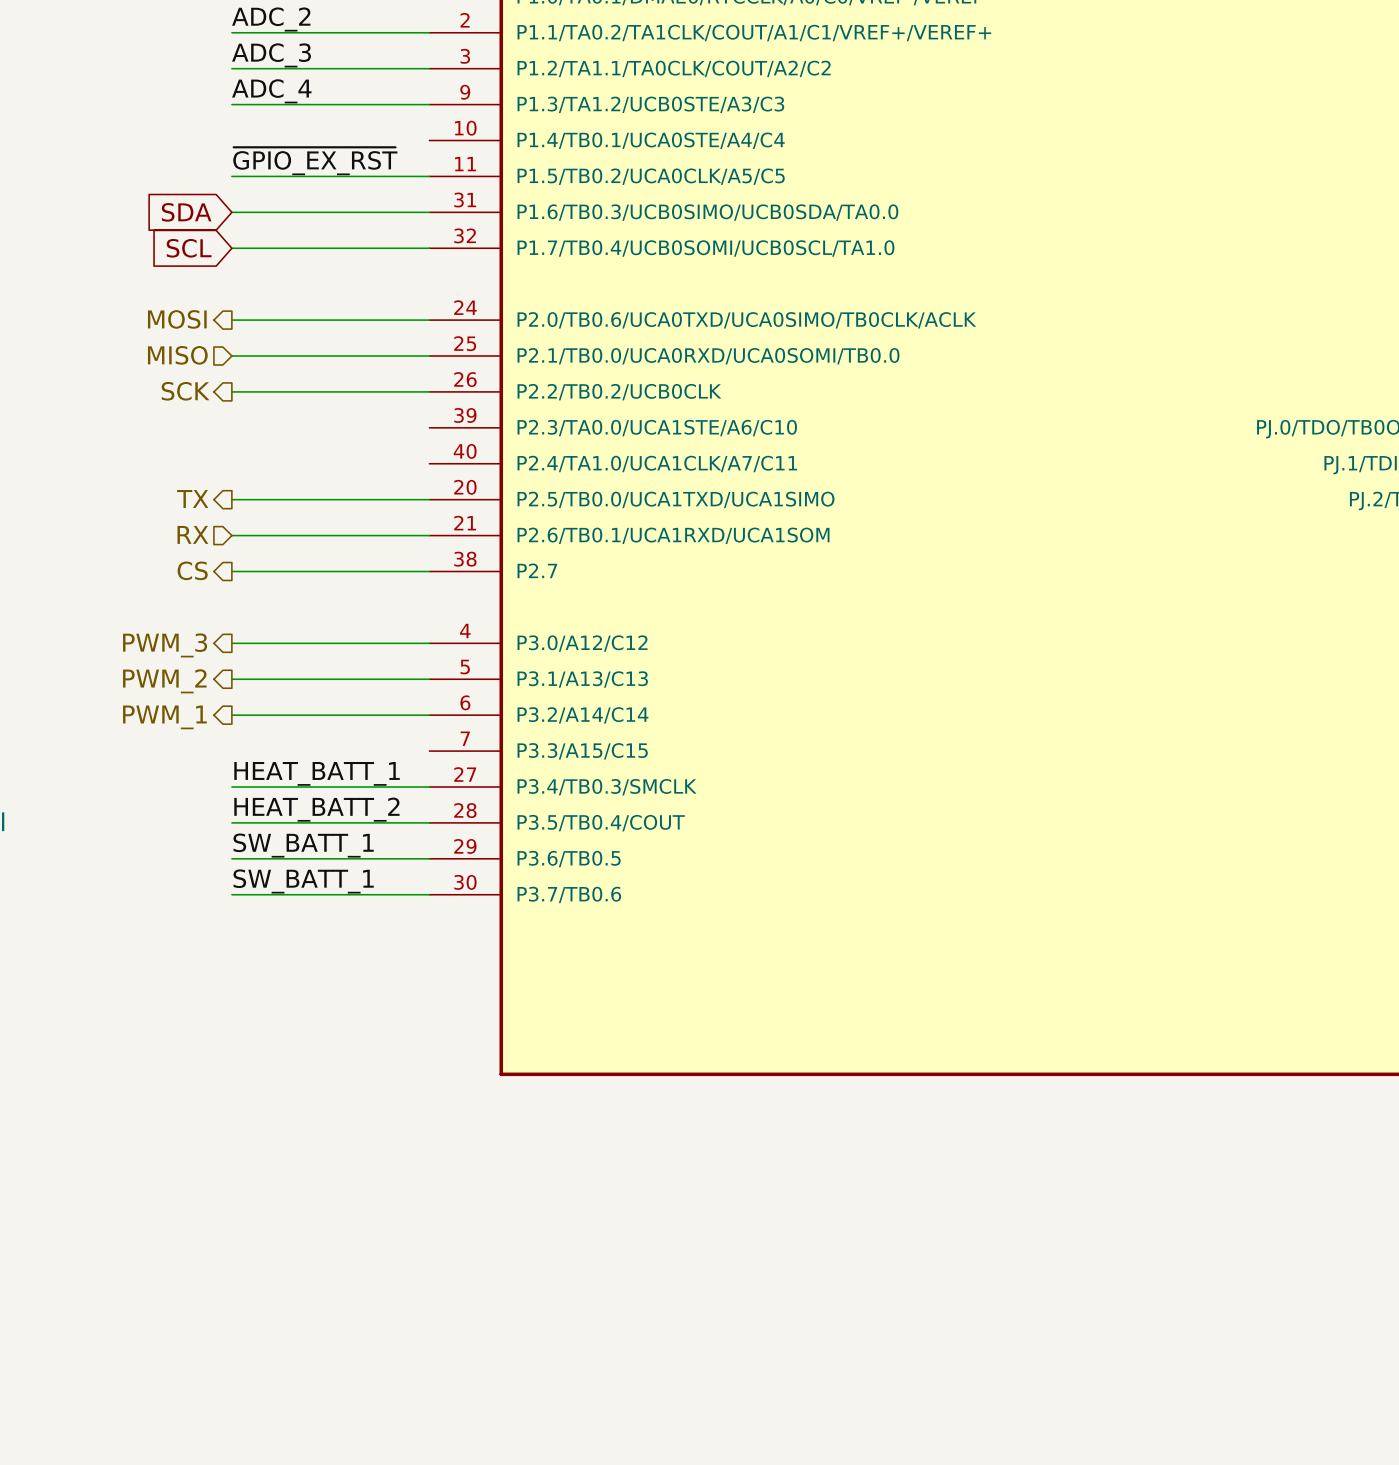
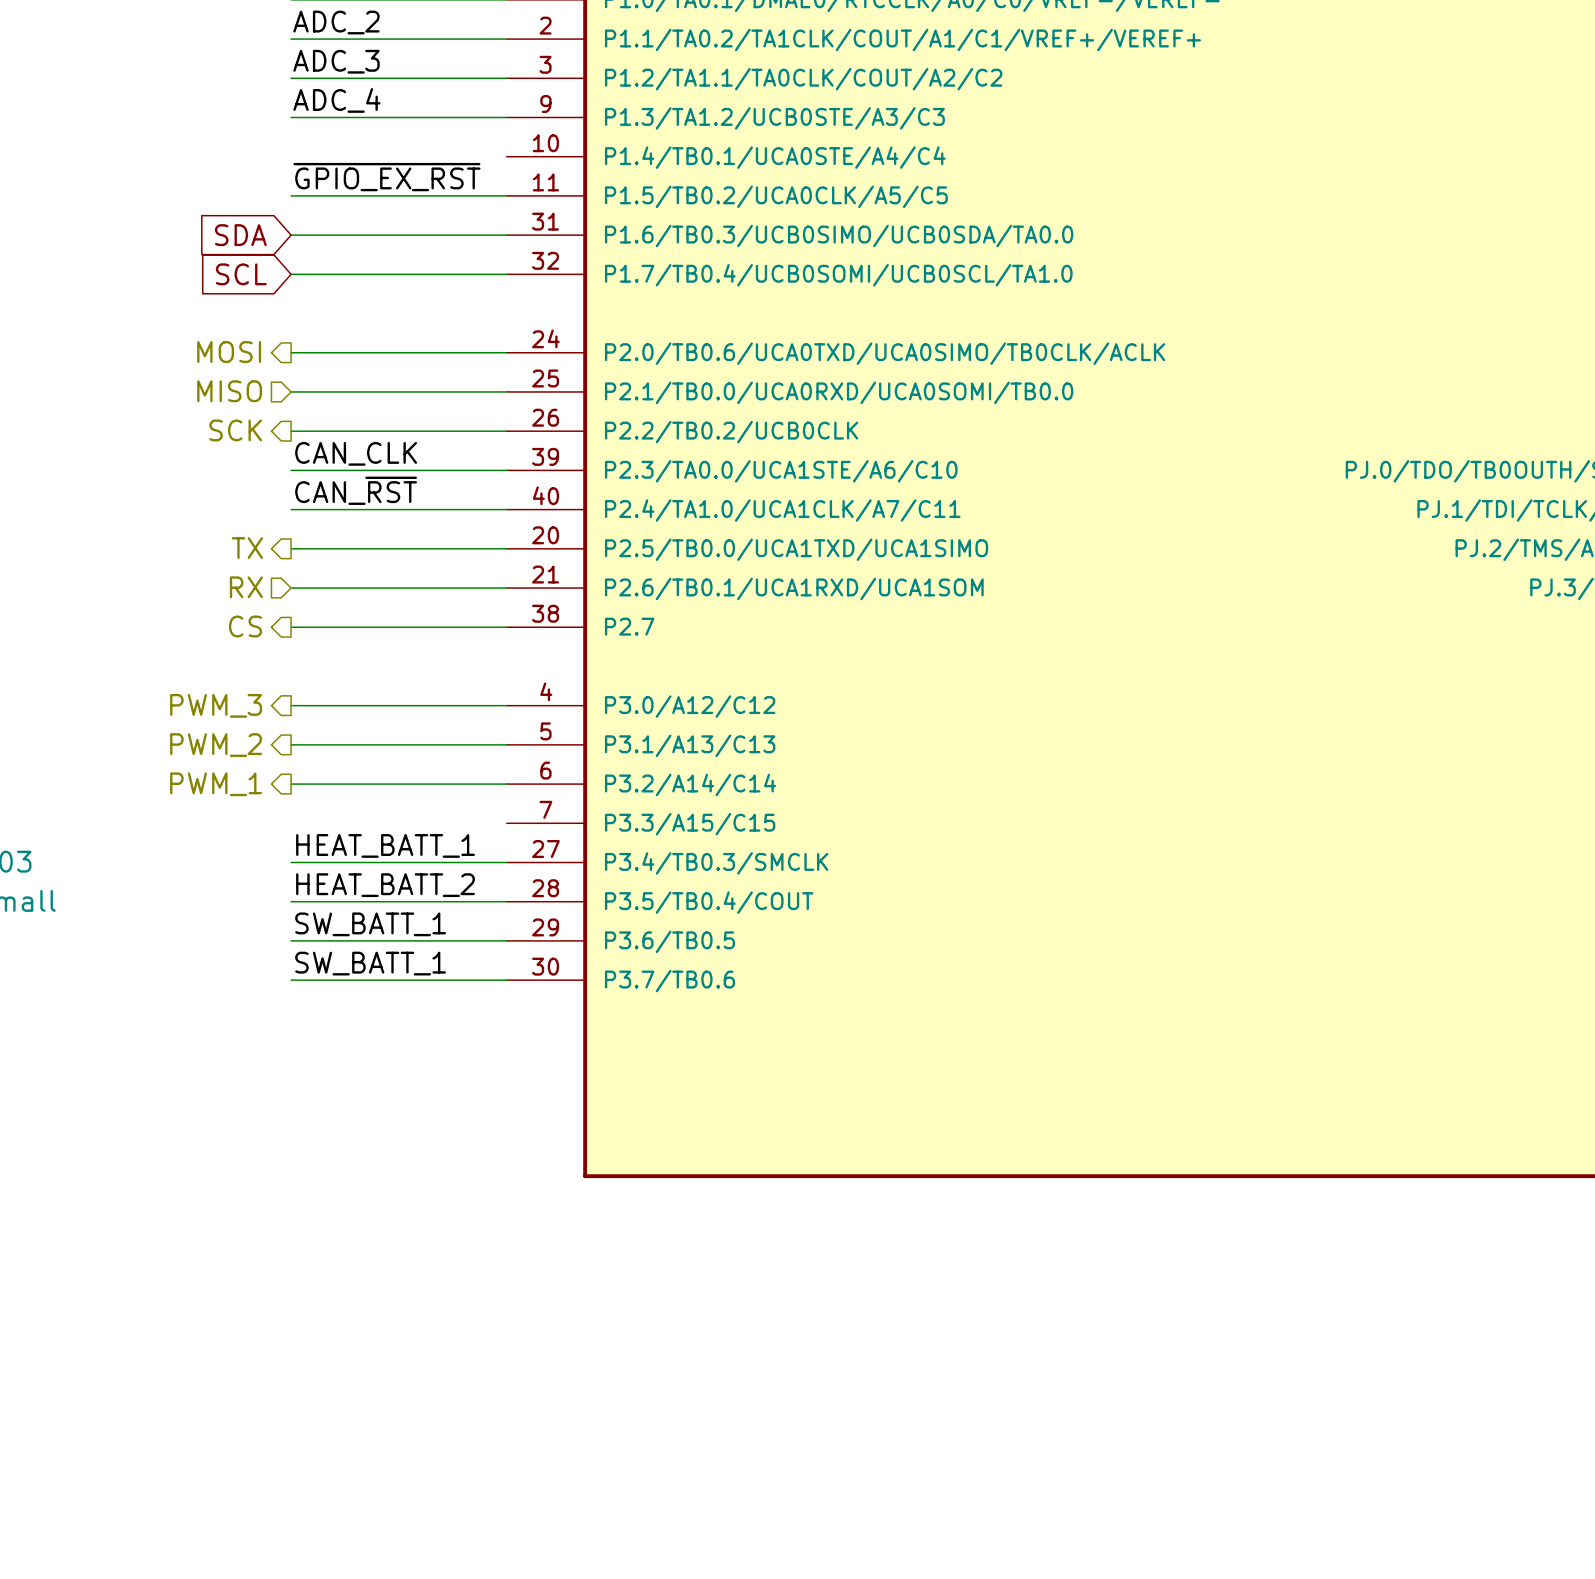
label: none -> CAN_CLK (356, 453)
wire: none -> (291, 470) (506, 470)
label: none -> CAN_~{RST} (356, 490)
wire: none -> (291, 509) (506, 509)

